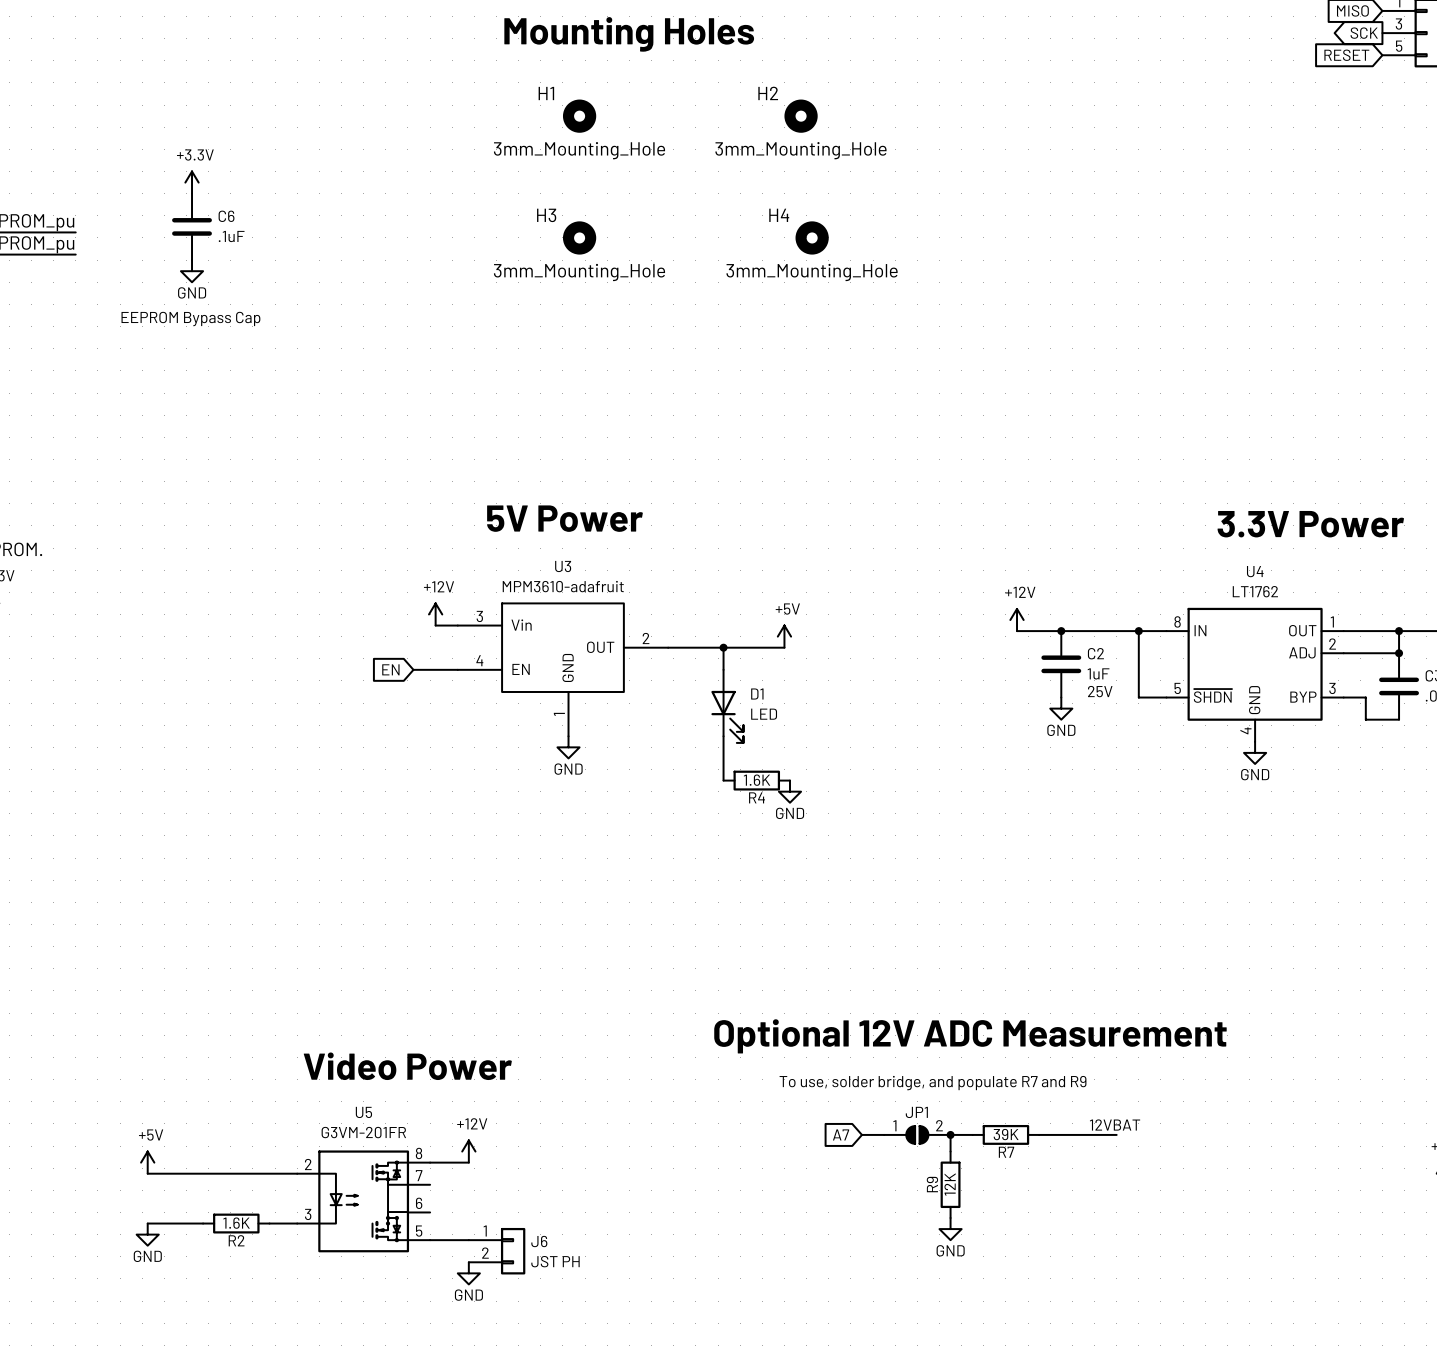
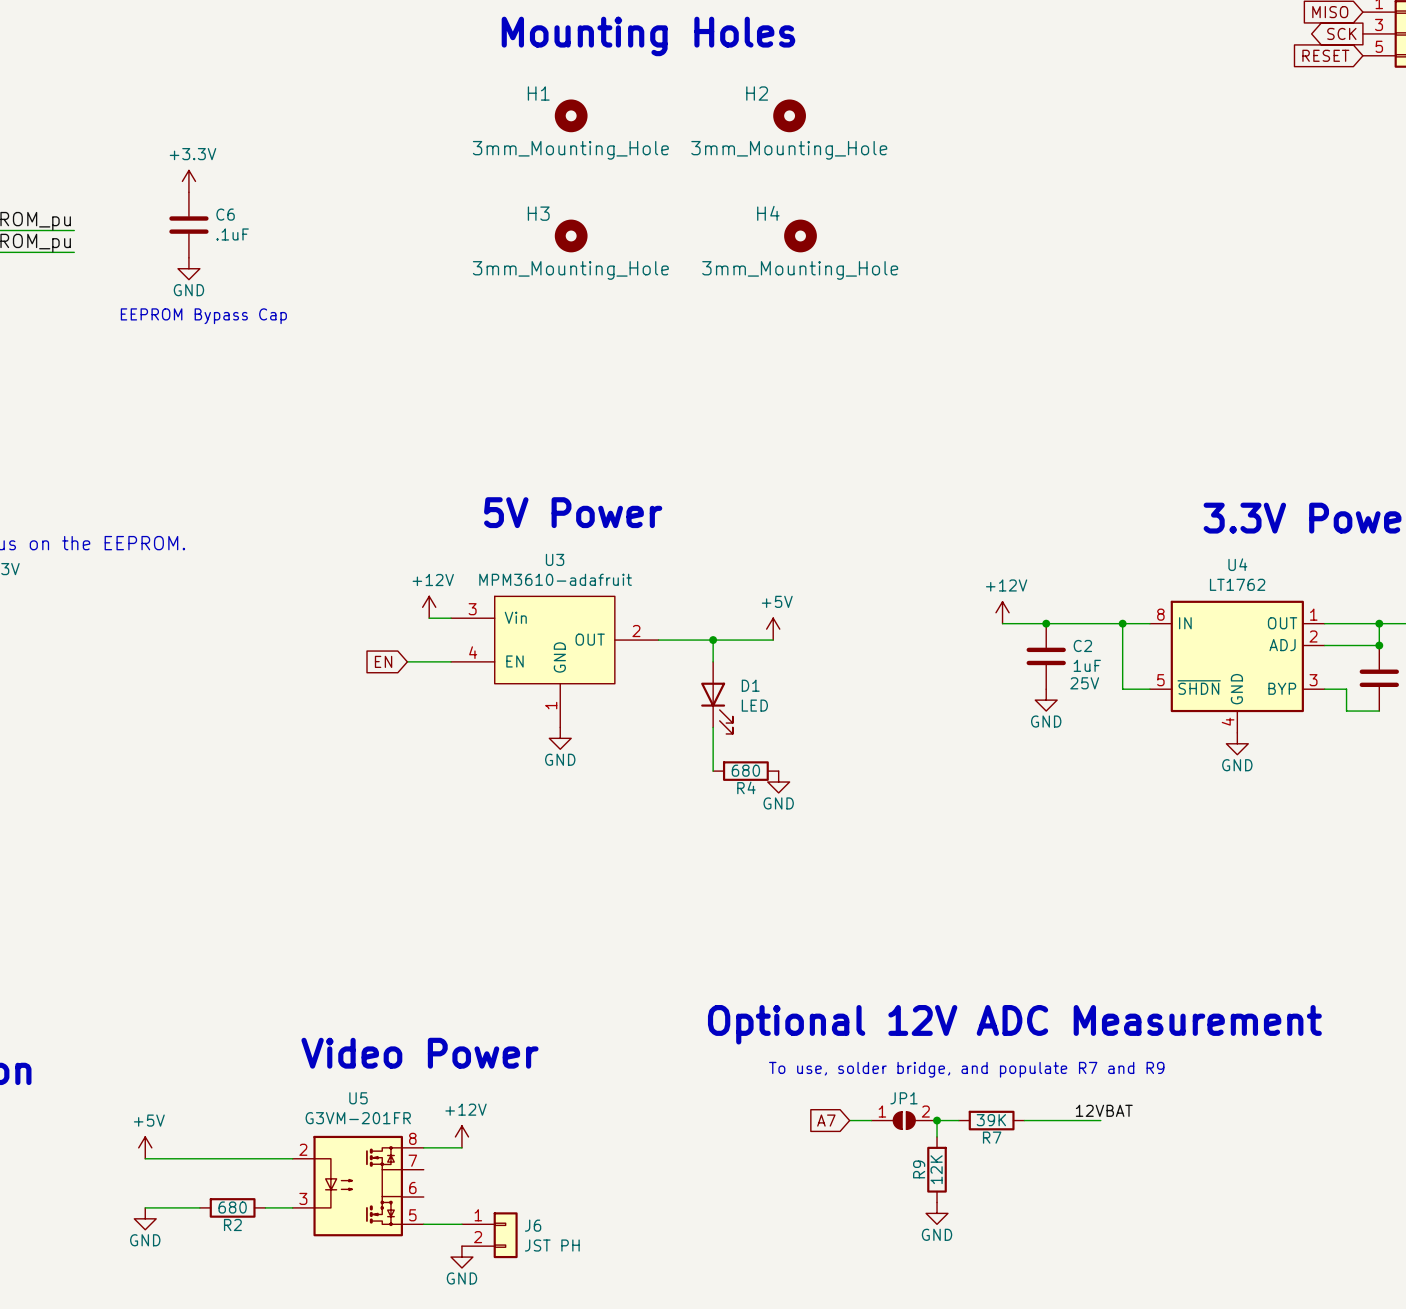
R4 value: 1.6K (757, 780) -> 680 (745, 770)
R2 value: 1.6K (236, 1223) -> 680 (232, 1207)

